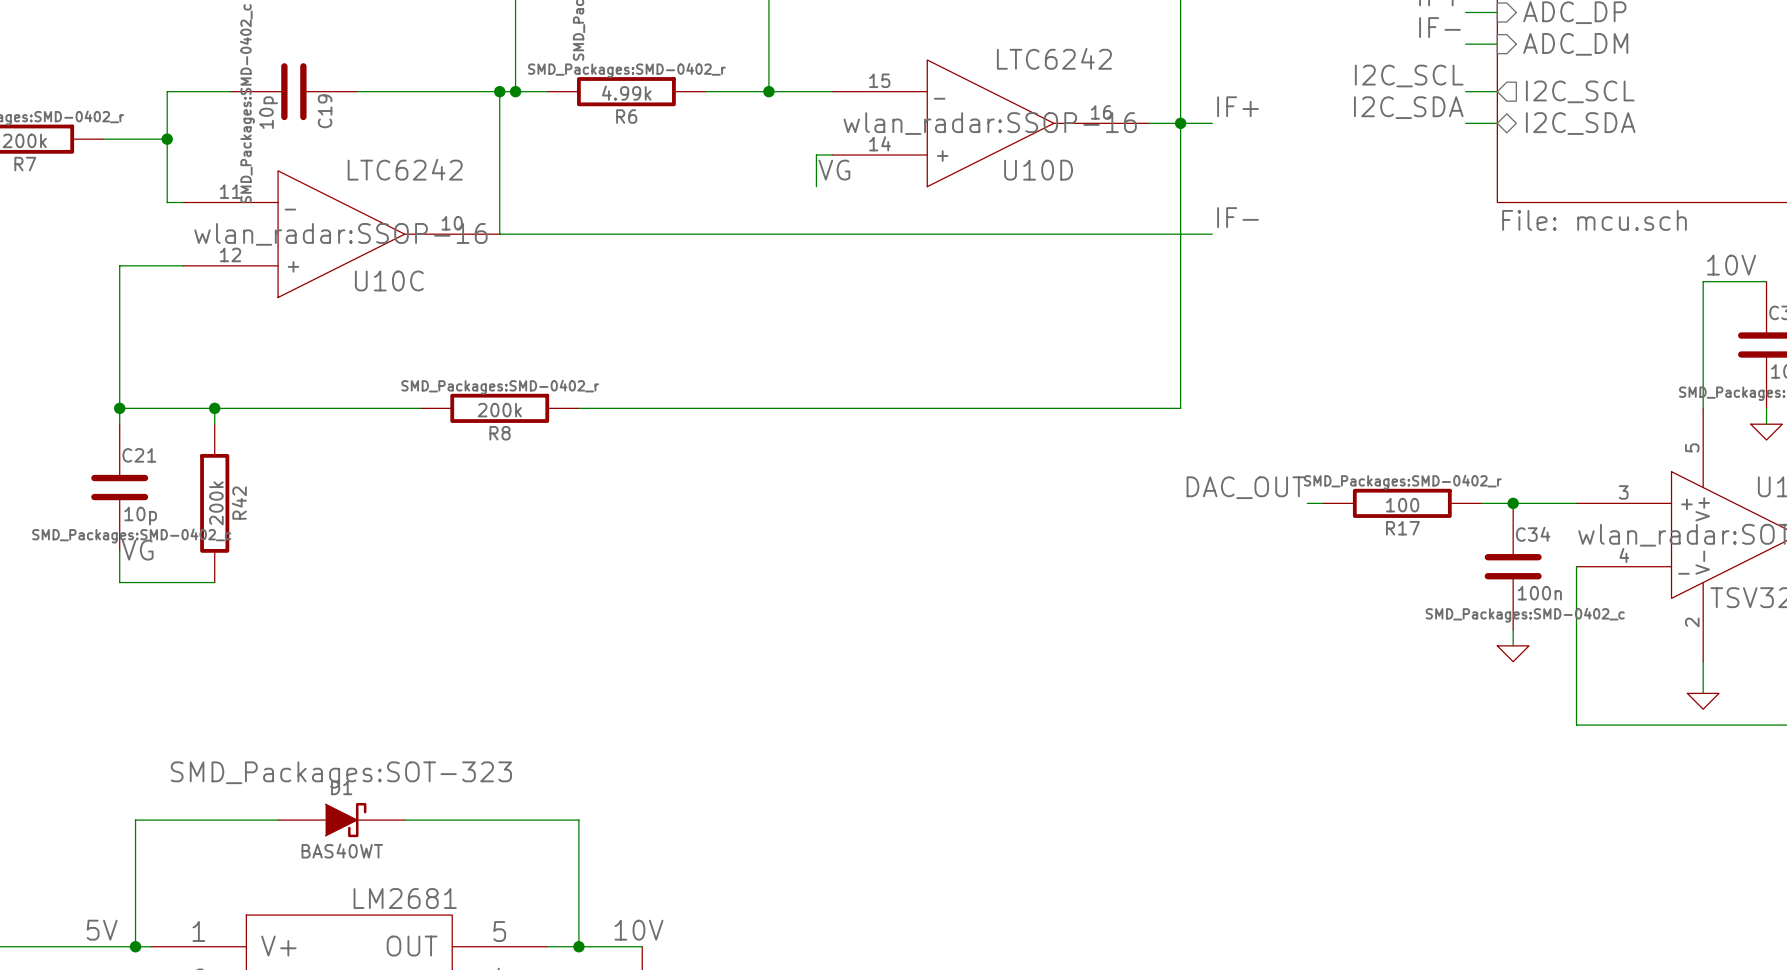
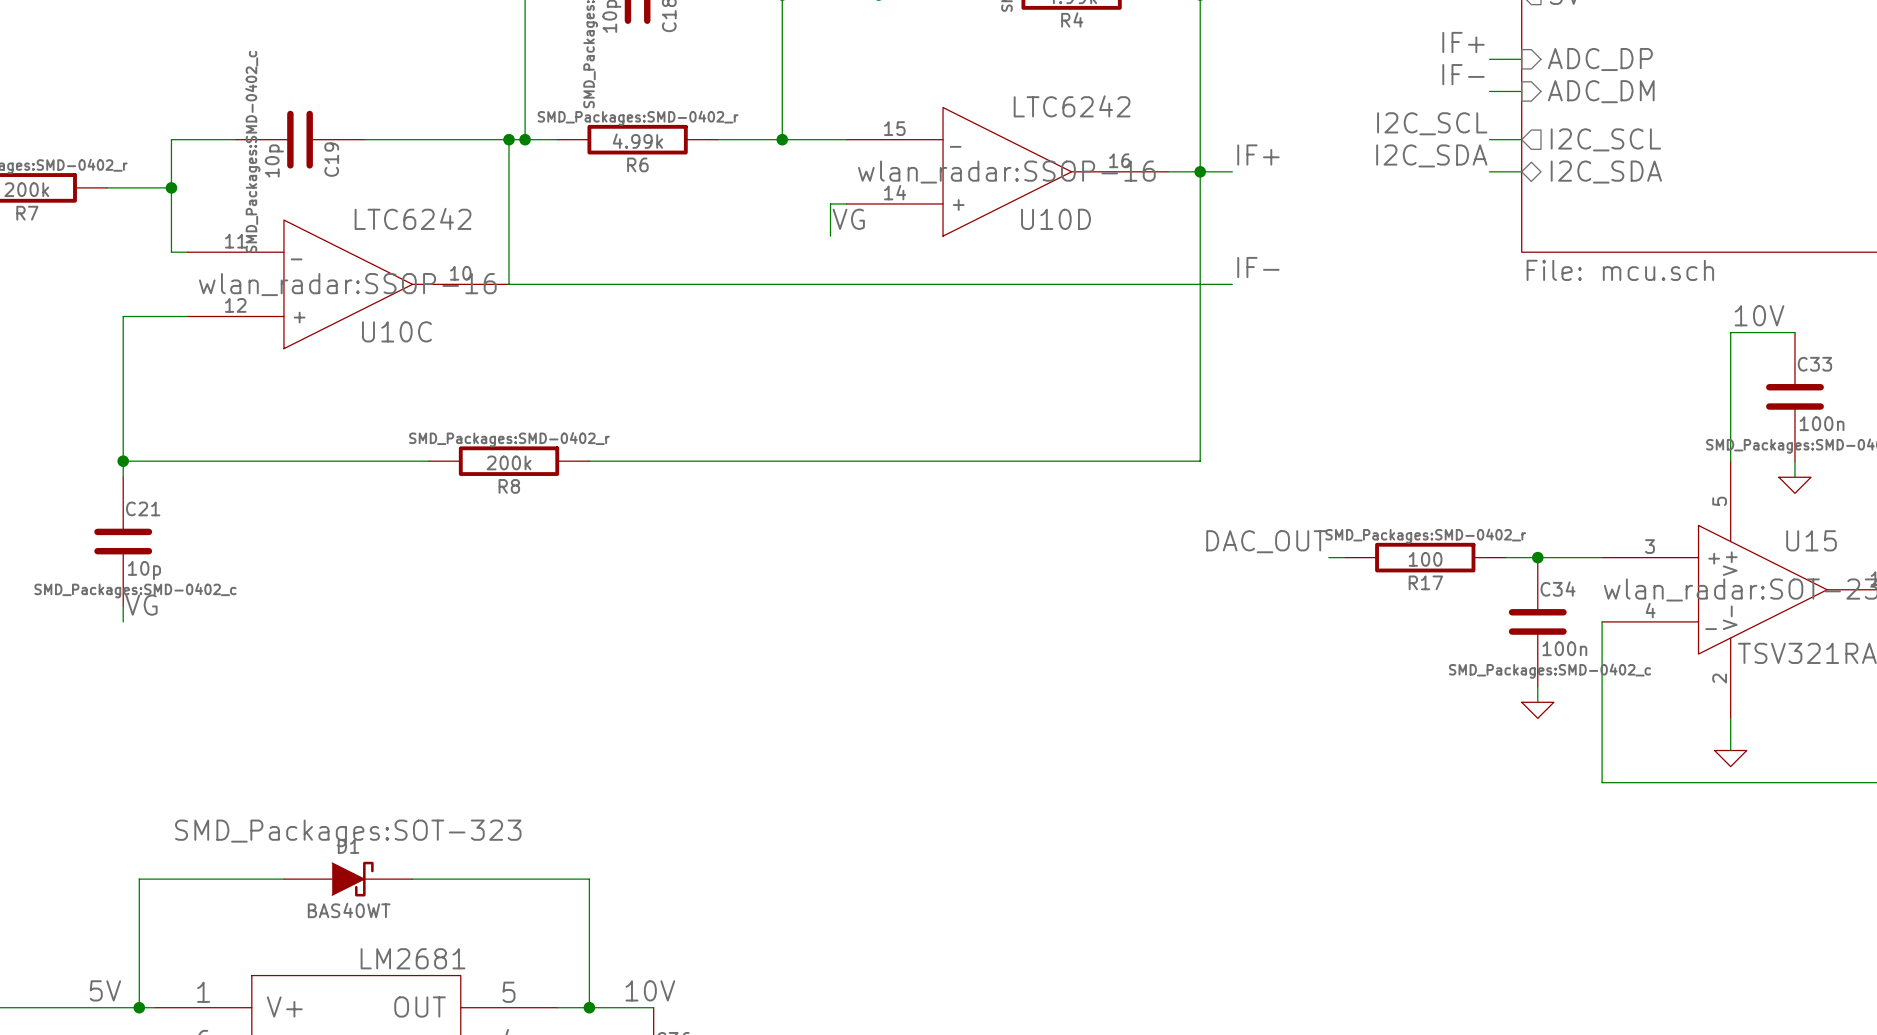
wire: (214, 408) (214, 424) -> none
junction: (214, 408) -> none
R42: 200k (214, 503) -> none
wire: (119, 566) (119, 582) (214, 582) -> none

